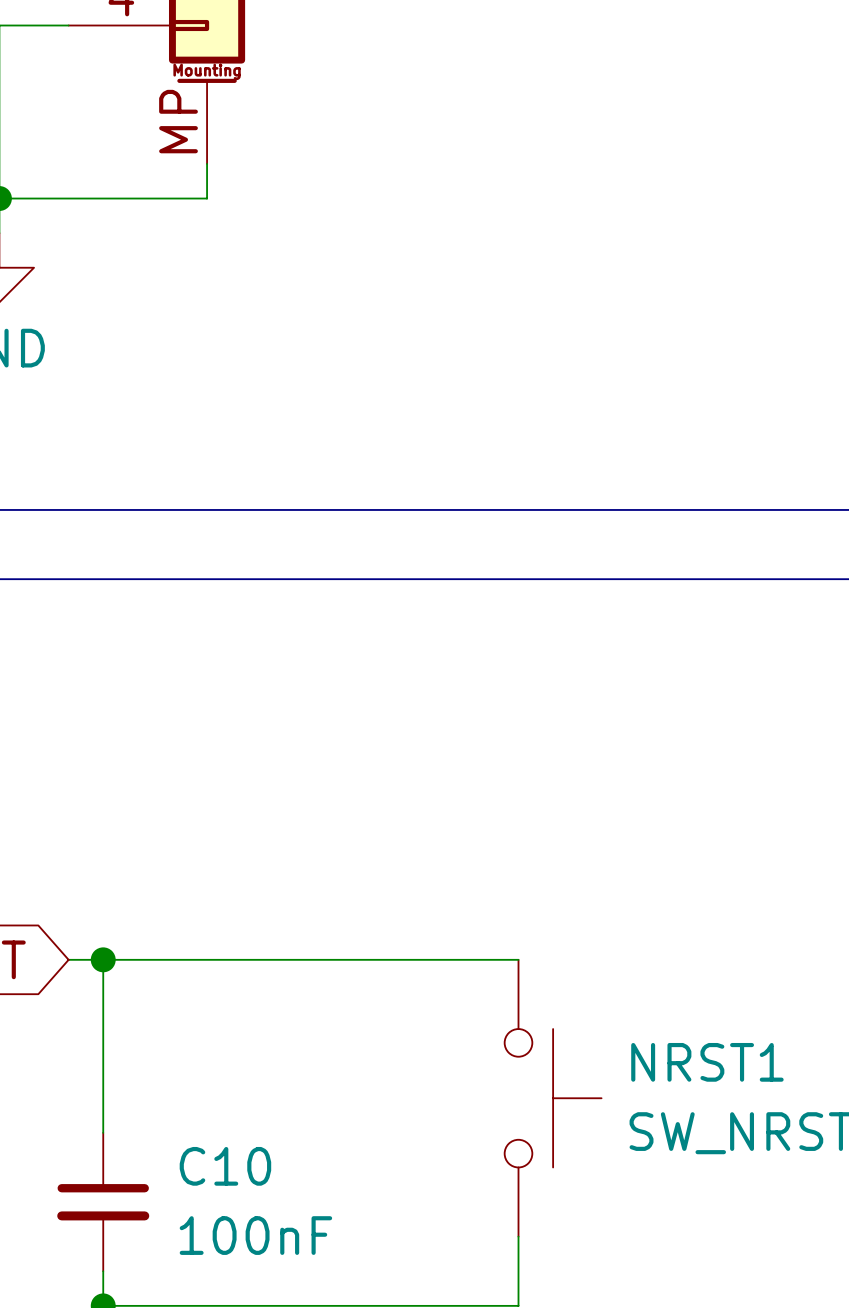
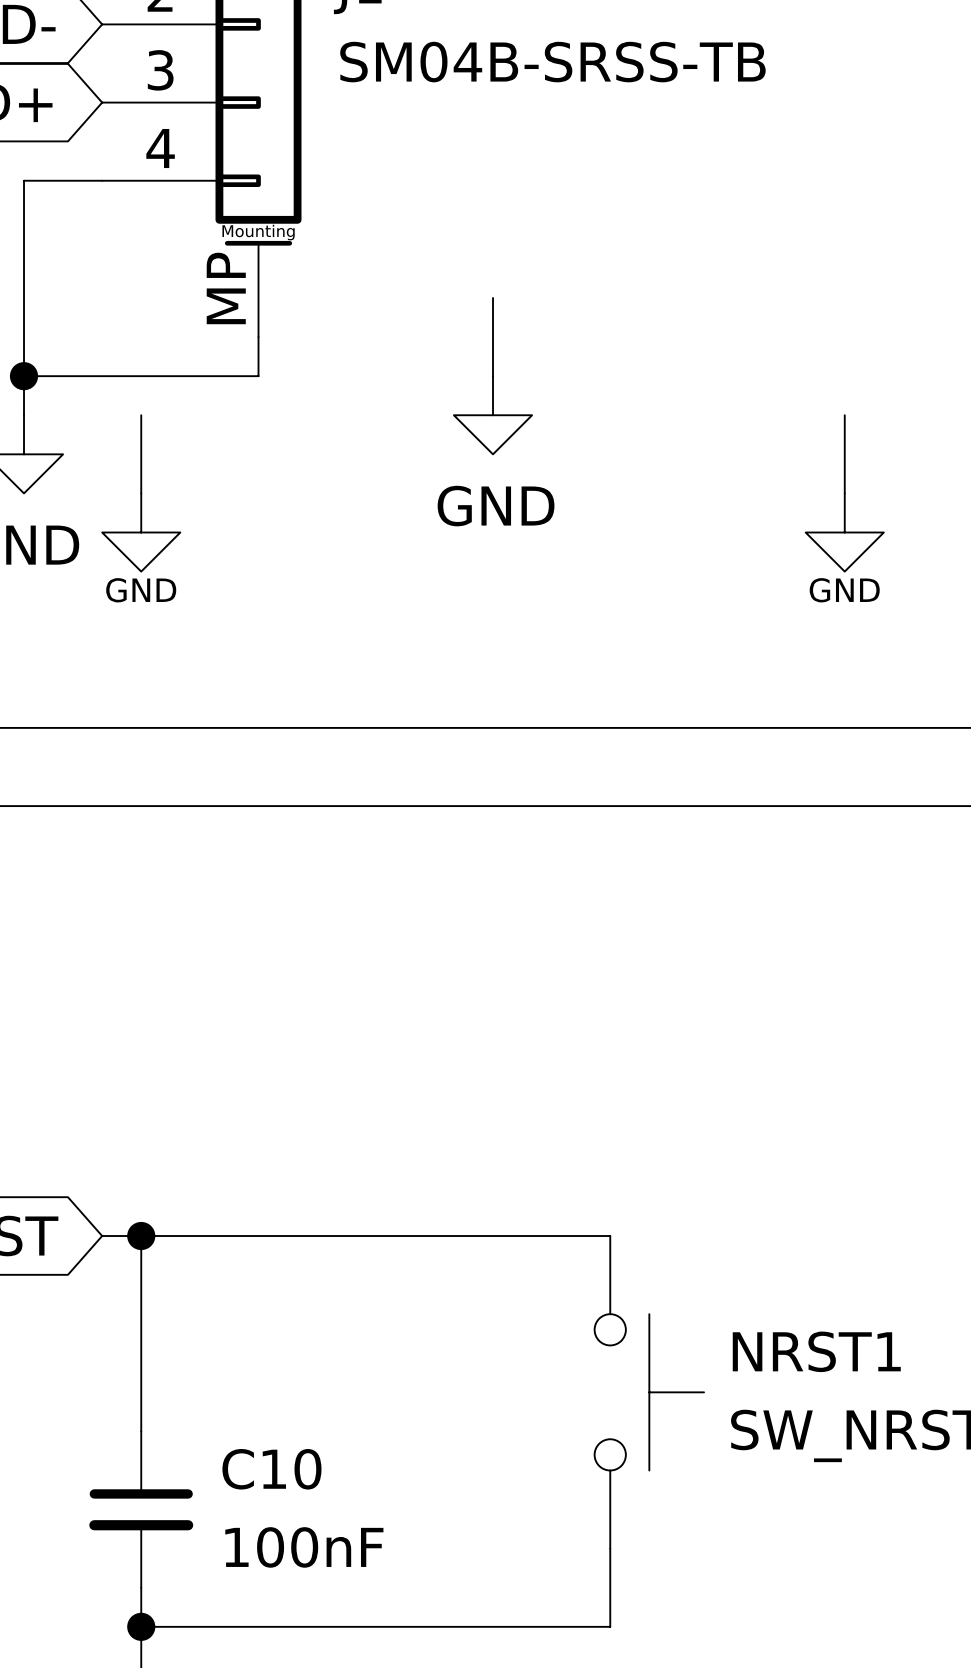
wire: none -> (493, 298) (493, 376)
wire: none -> (141, 415) (141, 493)
power symbol: none -> GND (493, 415)
wire: none -> (844, 415) (844, 493)
power symbol: none -> GND (141, 532)
power symbol: none -> GND (844, 532)

